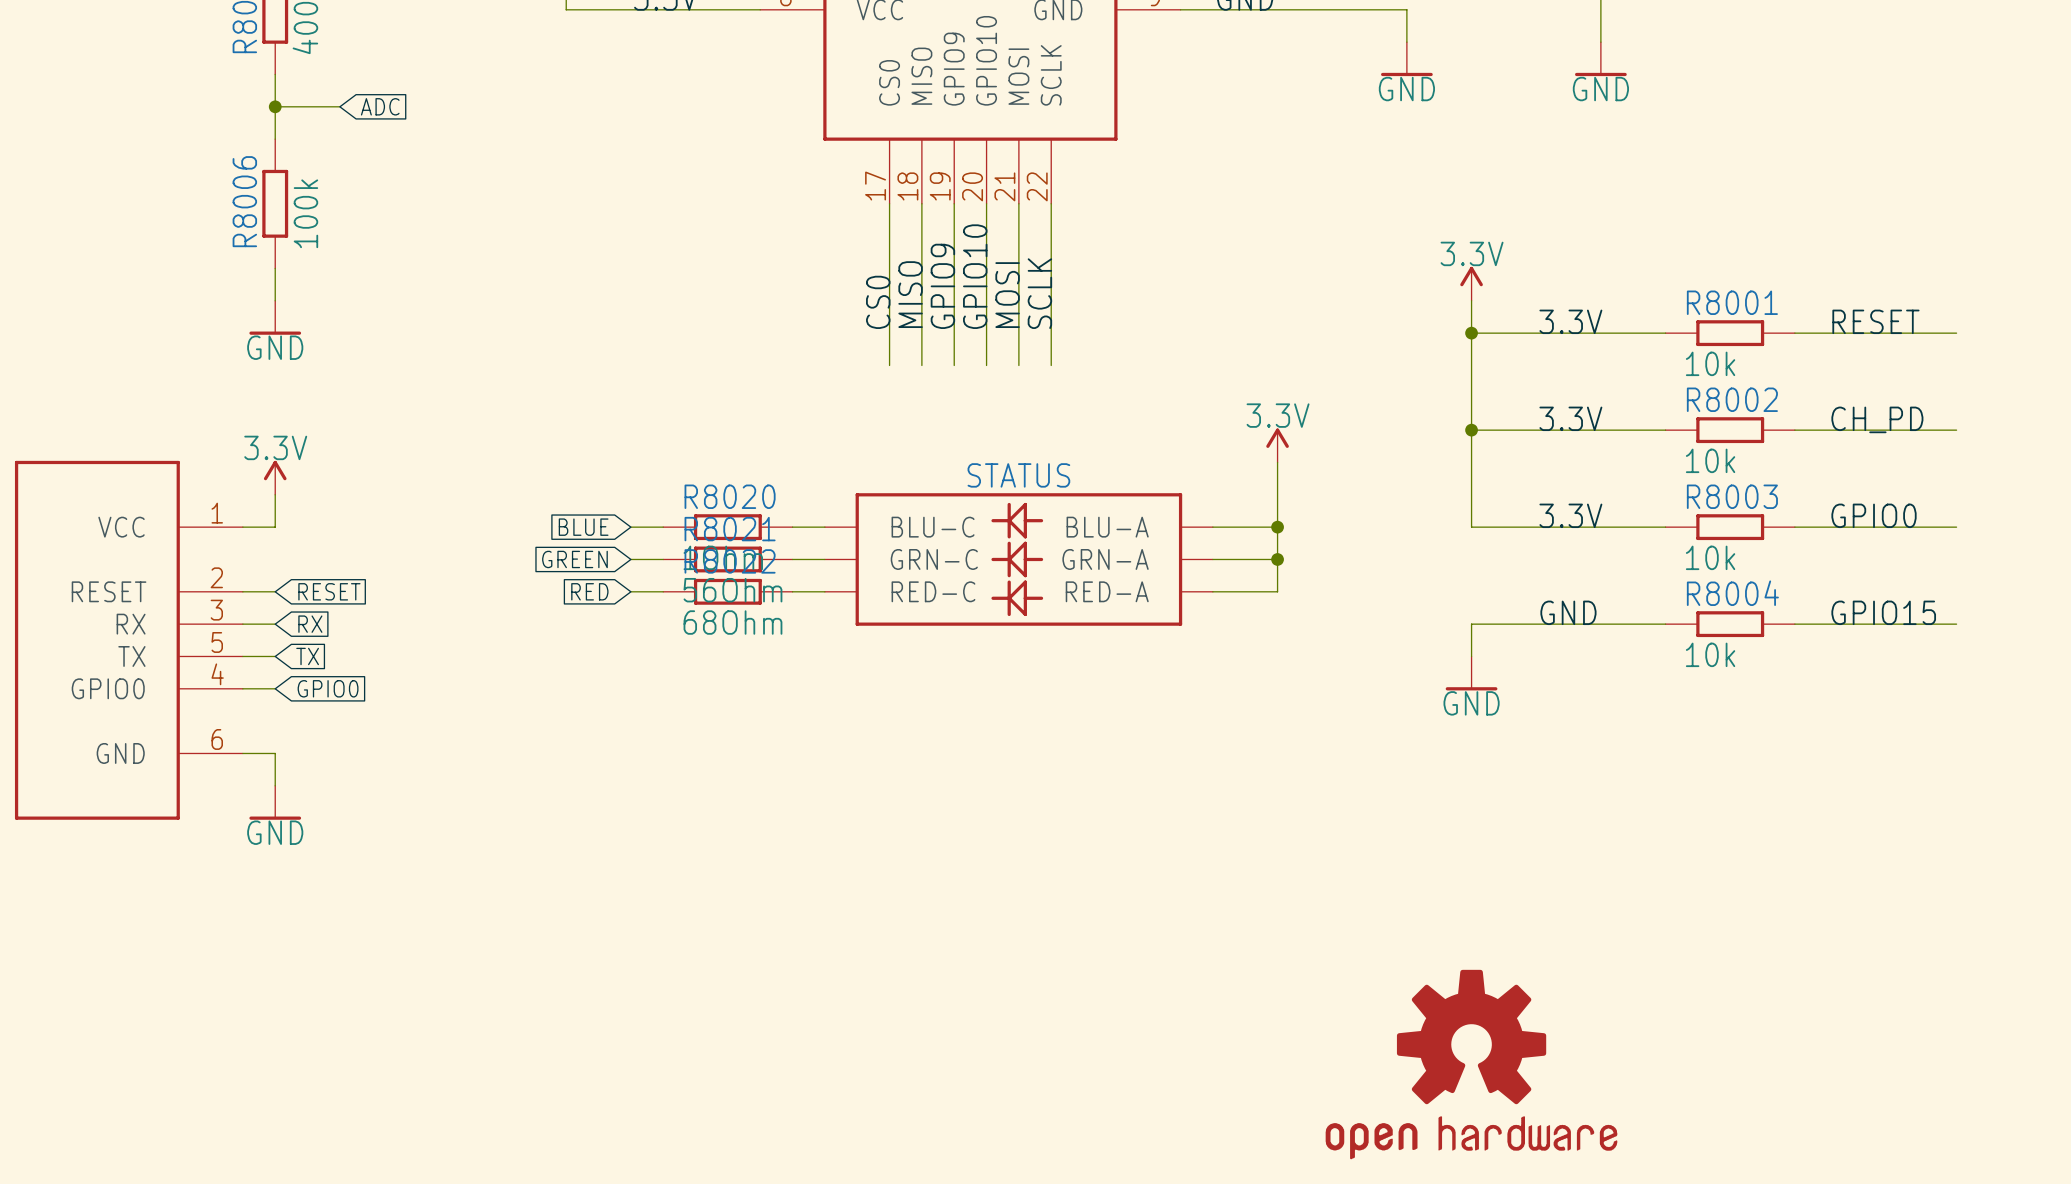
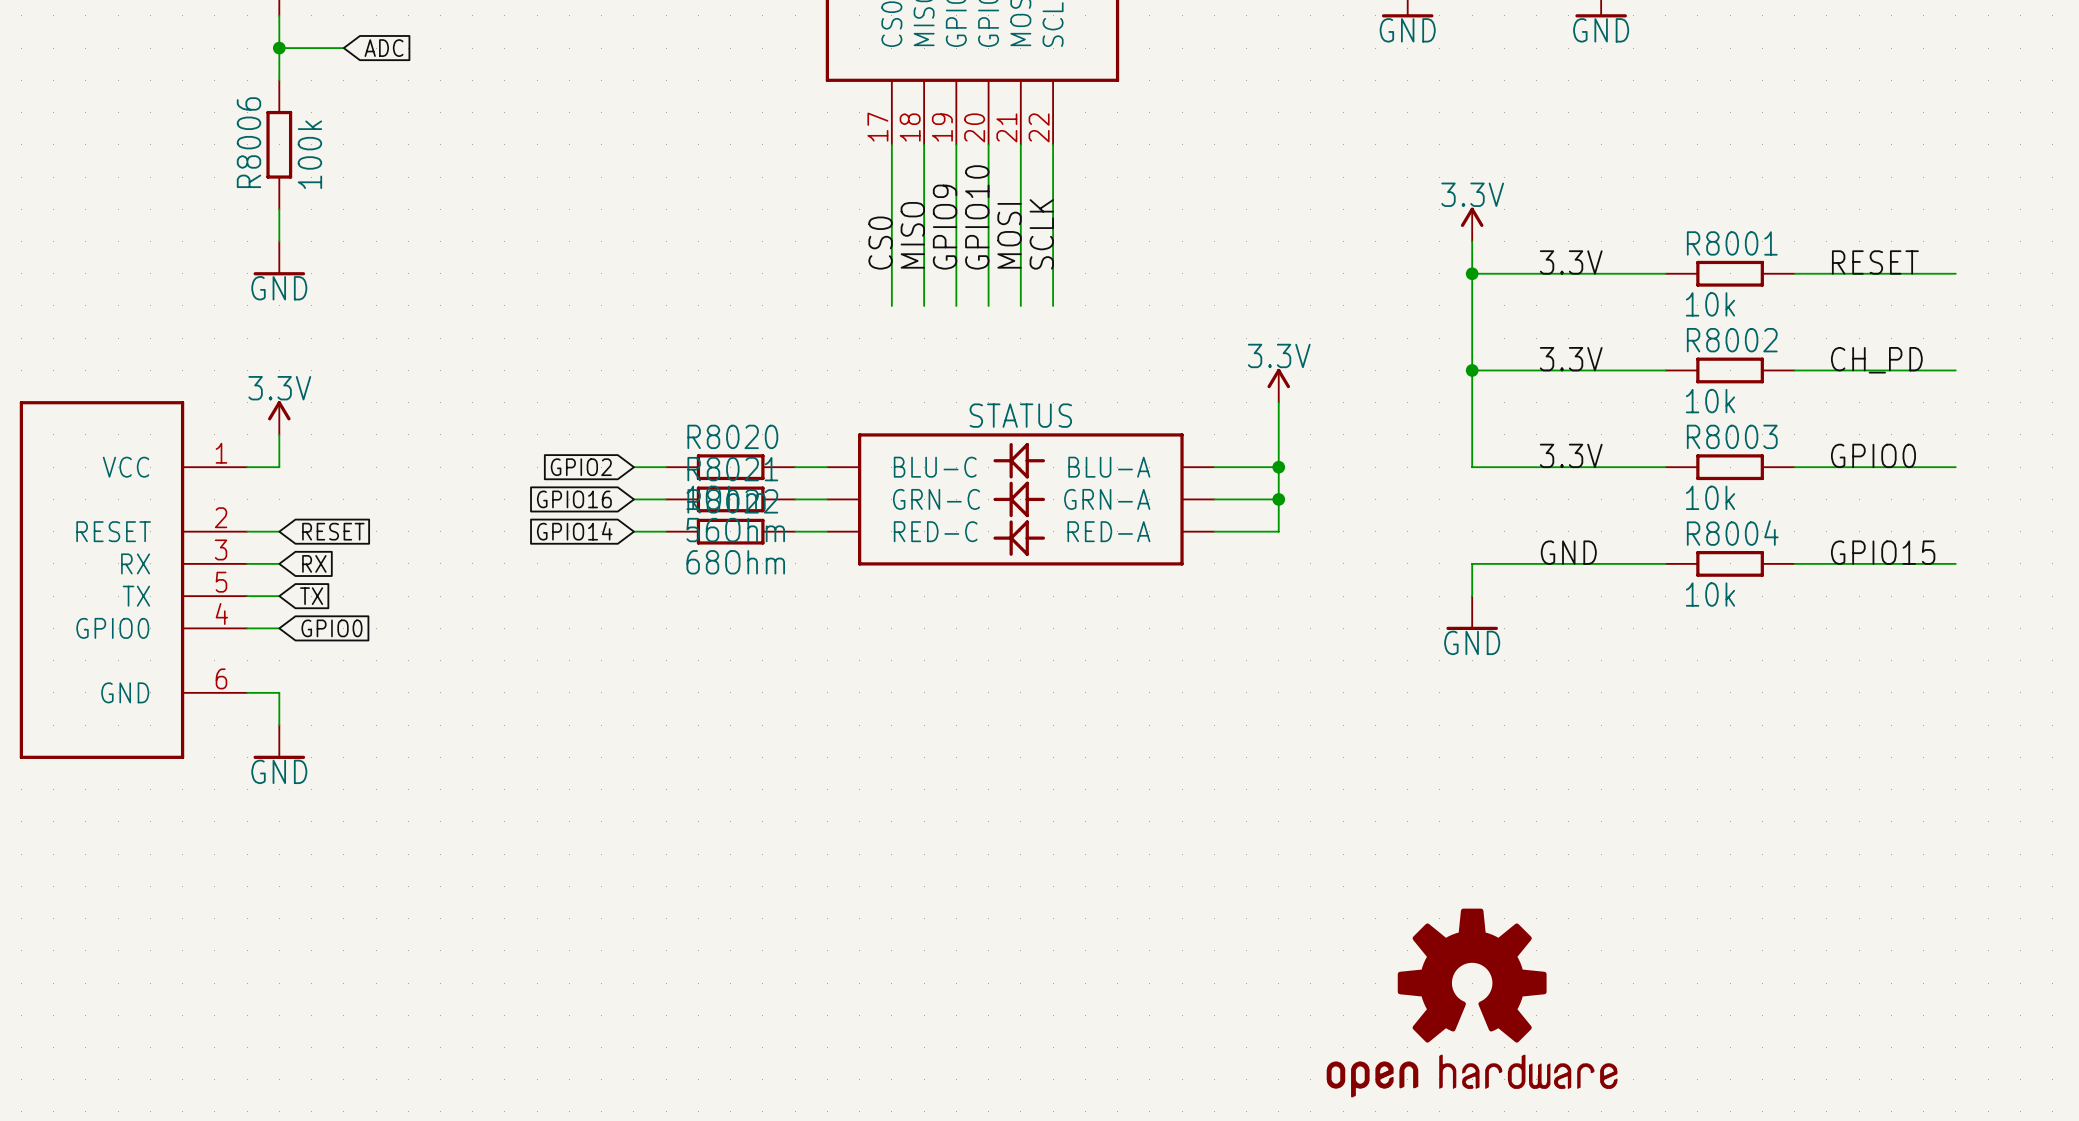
global label: BLUE (583, 527) -> GPIO2 (581, 467)
global label: GREEN (574, 559) -> GPIO16 (574, 499)
global label: RED (589, 591) -> GPIO14 (574, 531)

